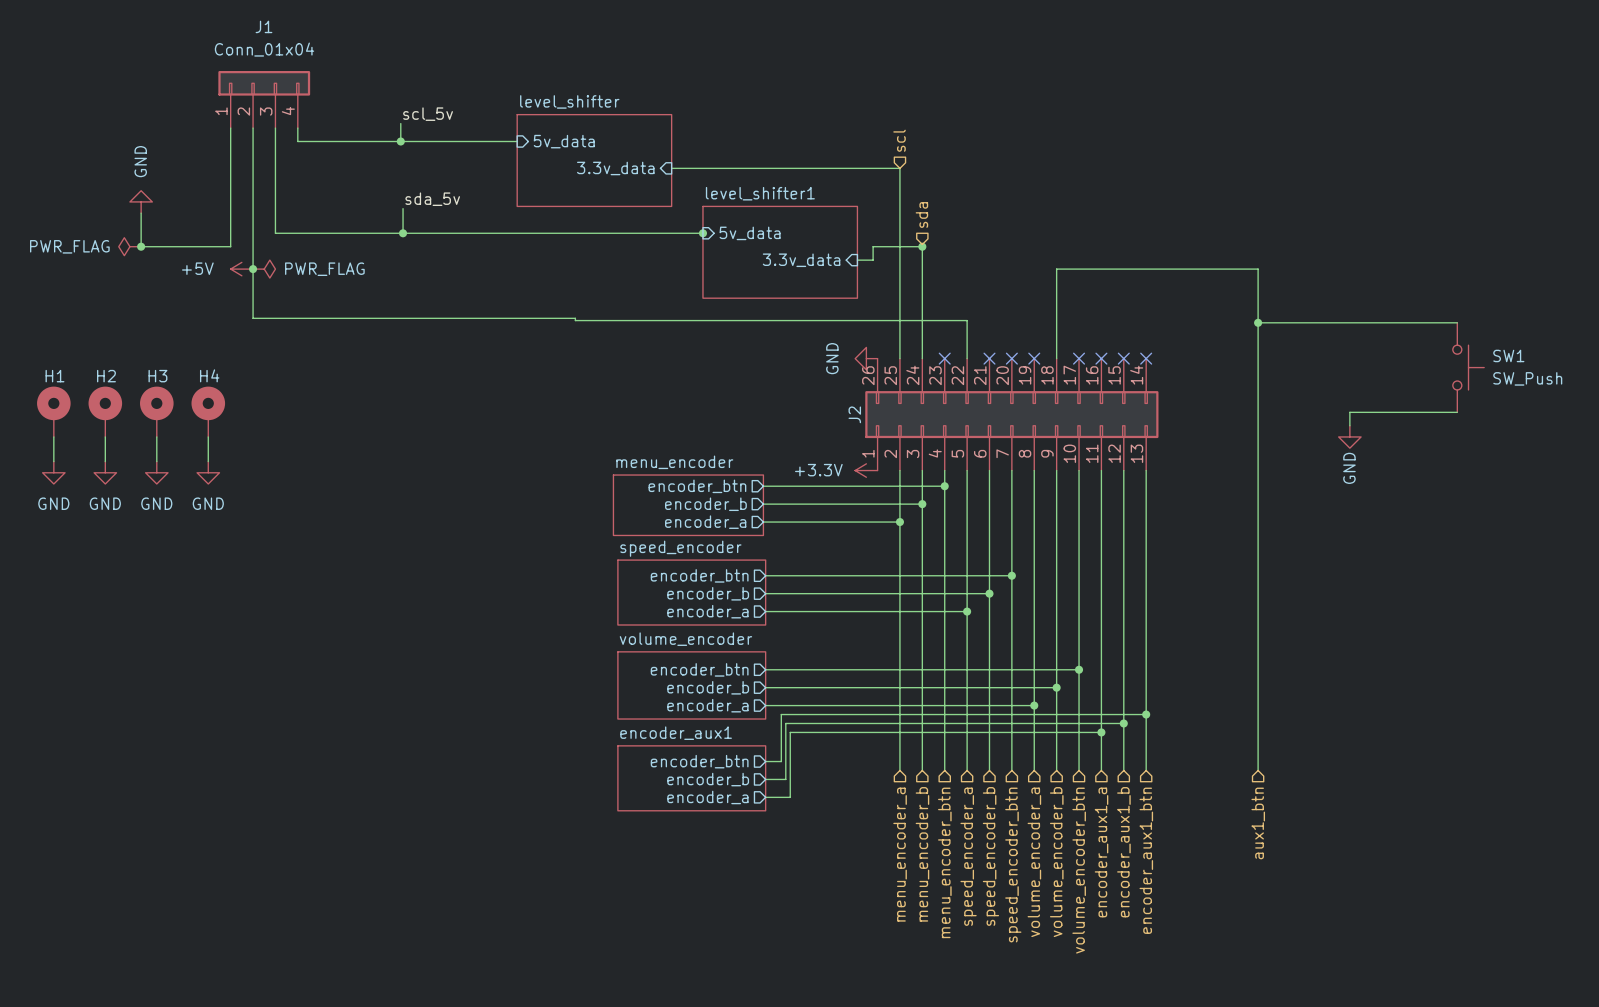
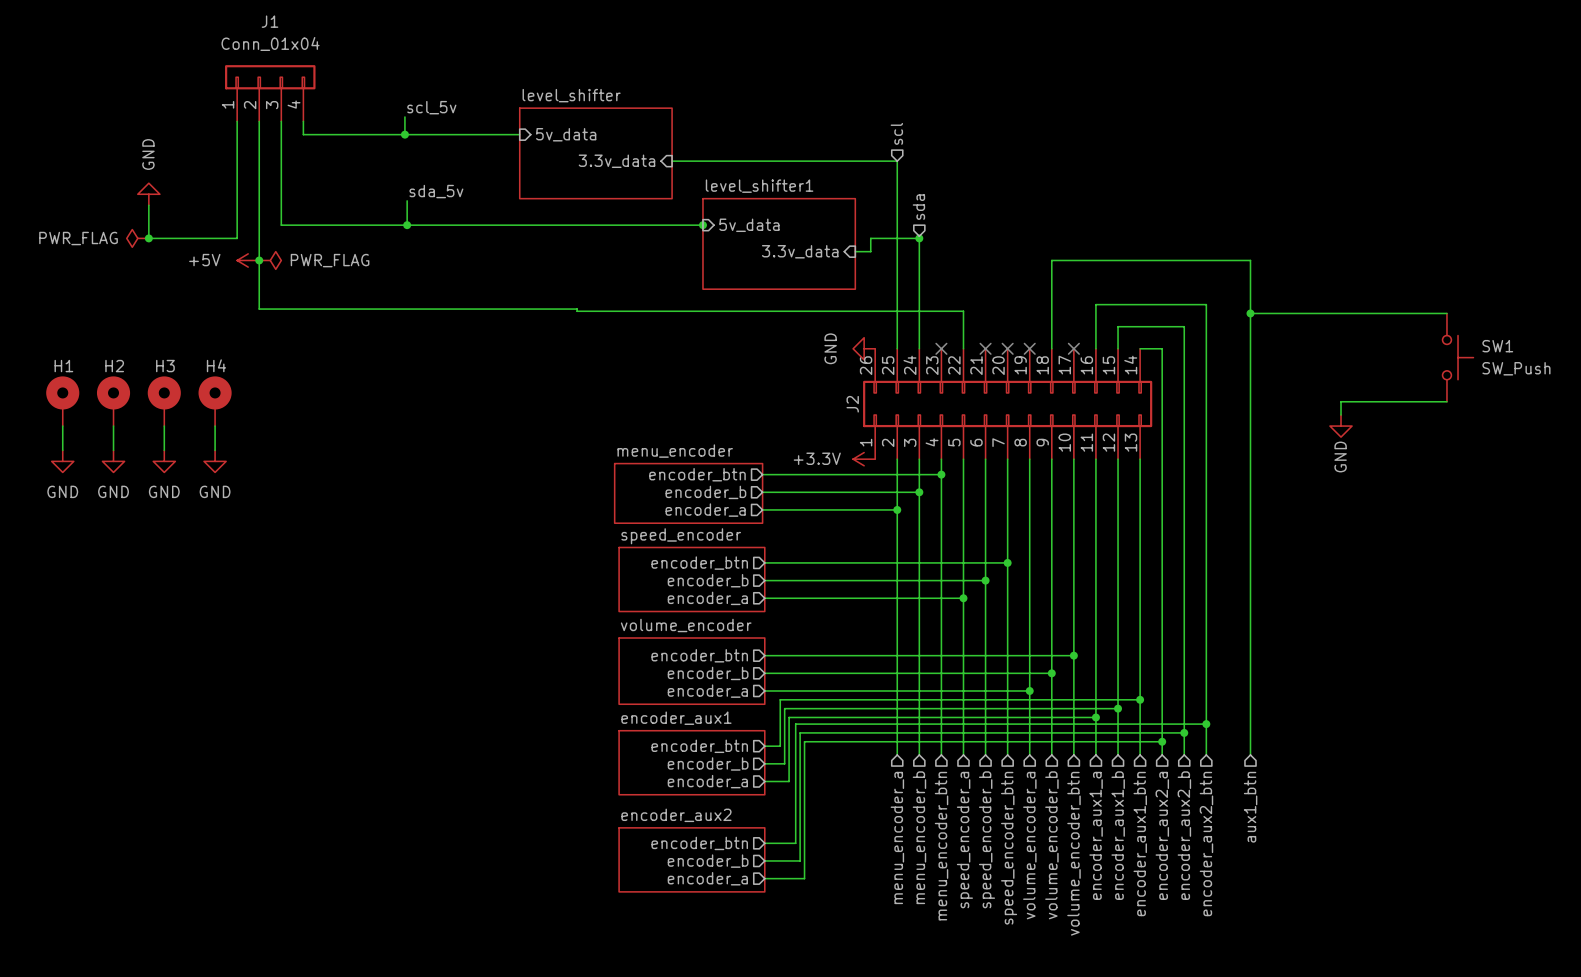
wire: none -> (1095, 348) (1095, 304) (1206, 304) (1206, 755)
no-connect mark: (1101, 358) -> none
wire: none -> (1118, 348) (1118, 326) (1184, 326) (1184, 755)
no-connect mark: (1123, 358) -> none
wire: none -> (1140, 348) (1162, 348) (1162, 755)
no-connect mark: (1146, 358) -> none
wire: none -> (1206, 724) (795, 724) (795, 843) (764, 843)
junction: none -> (1206, 724)
wire: none -> (1184, 732) (800, 732) (800, 860) (764, 860)
junction: none -> (1184, 732)
wire: none -> (1162, 741) (804, 741) (804, 878) (764, 878)
junction: none -> (1162, 741)
hierarchical label: none -> encoder_aux2_a (1162, 835)
hierarchical label: none -> encoder_aux2_b (1184, 835)
sheet pin: none -> encoder_btn (699, 843)
hierarchical label: none -> encoder_aux2_btn (1206, 844)
sheet encoder_aux2: none -> (691, 859)
sheet pin: none -> encoder_b (708, 861)
sheet pin: none -> encoder_a (707, 878)

